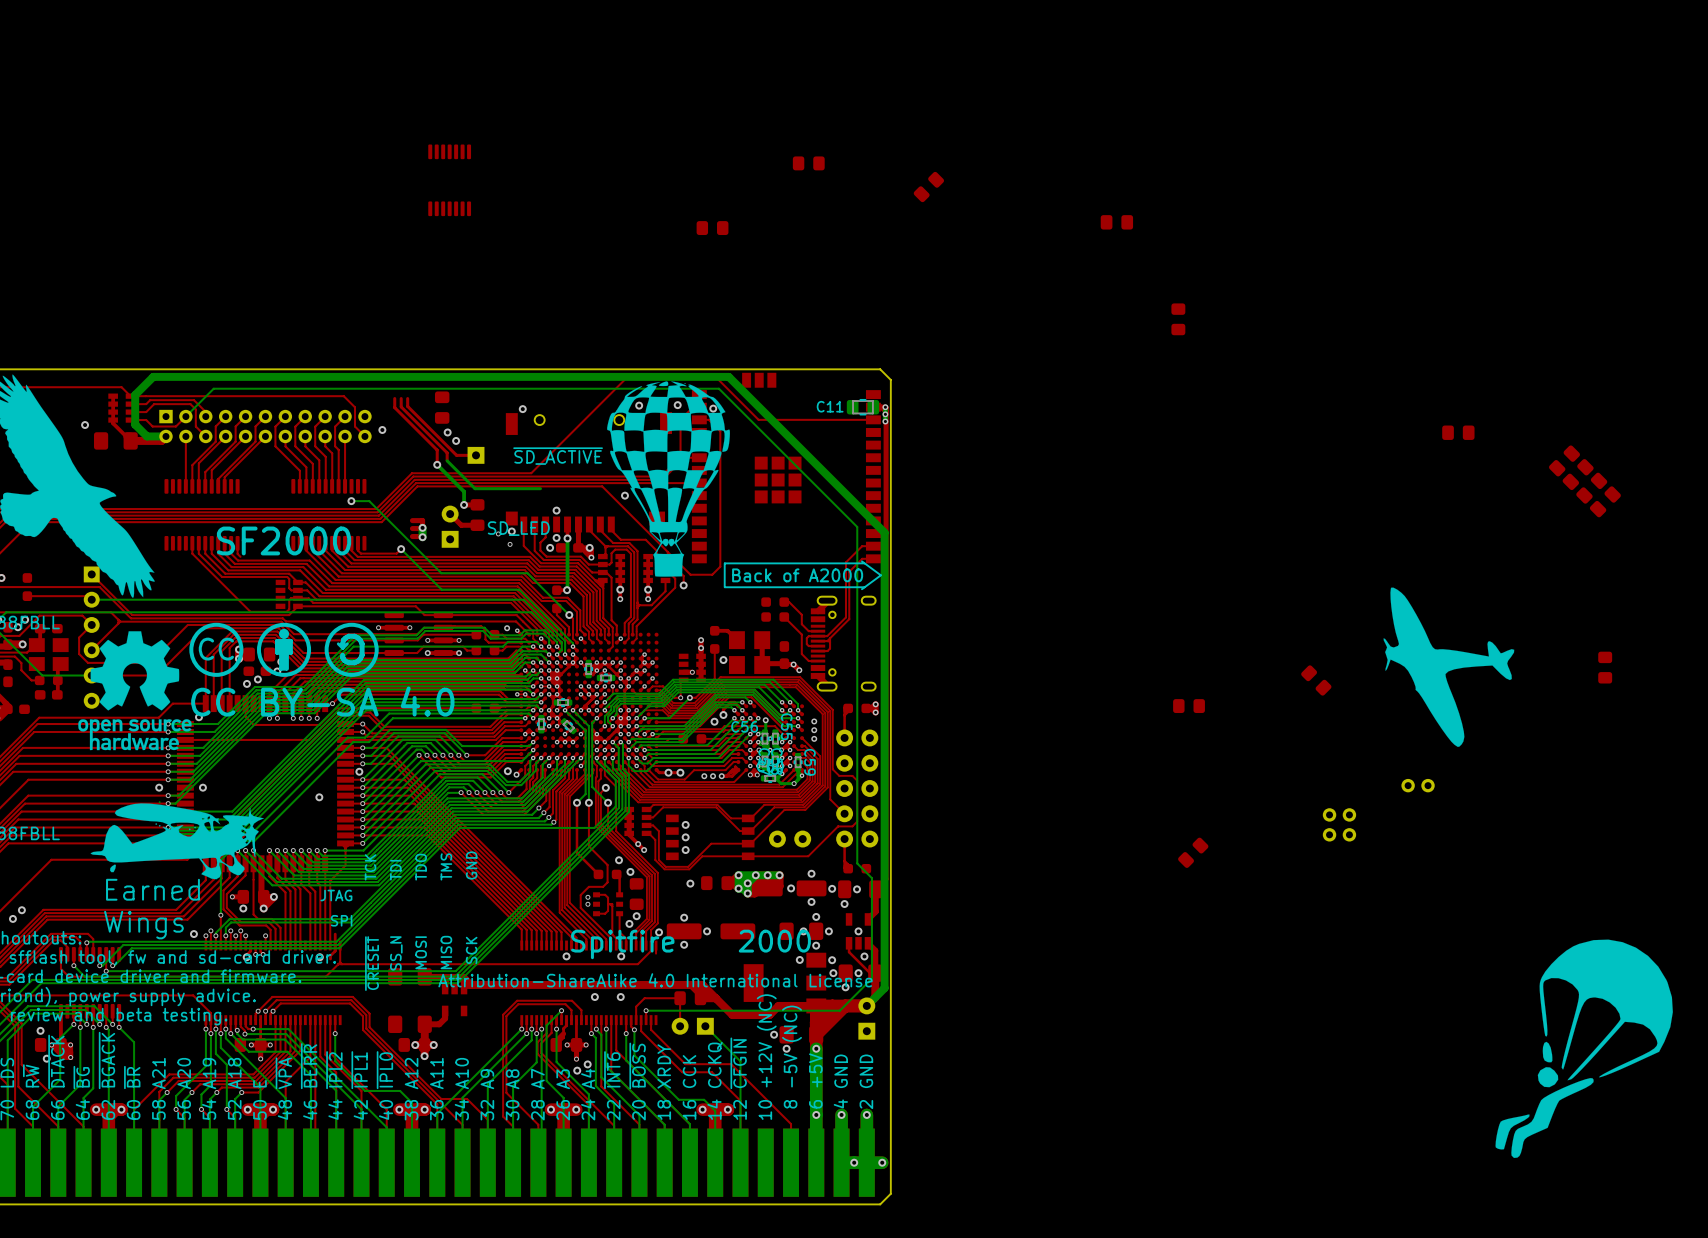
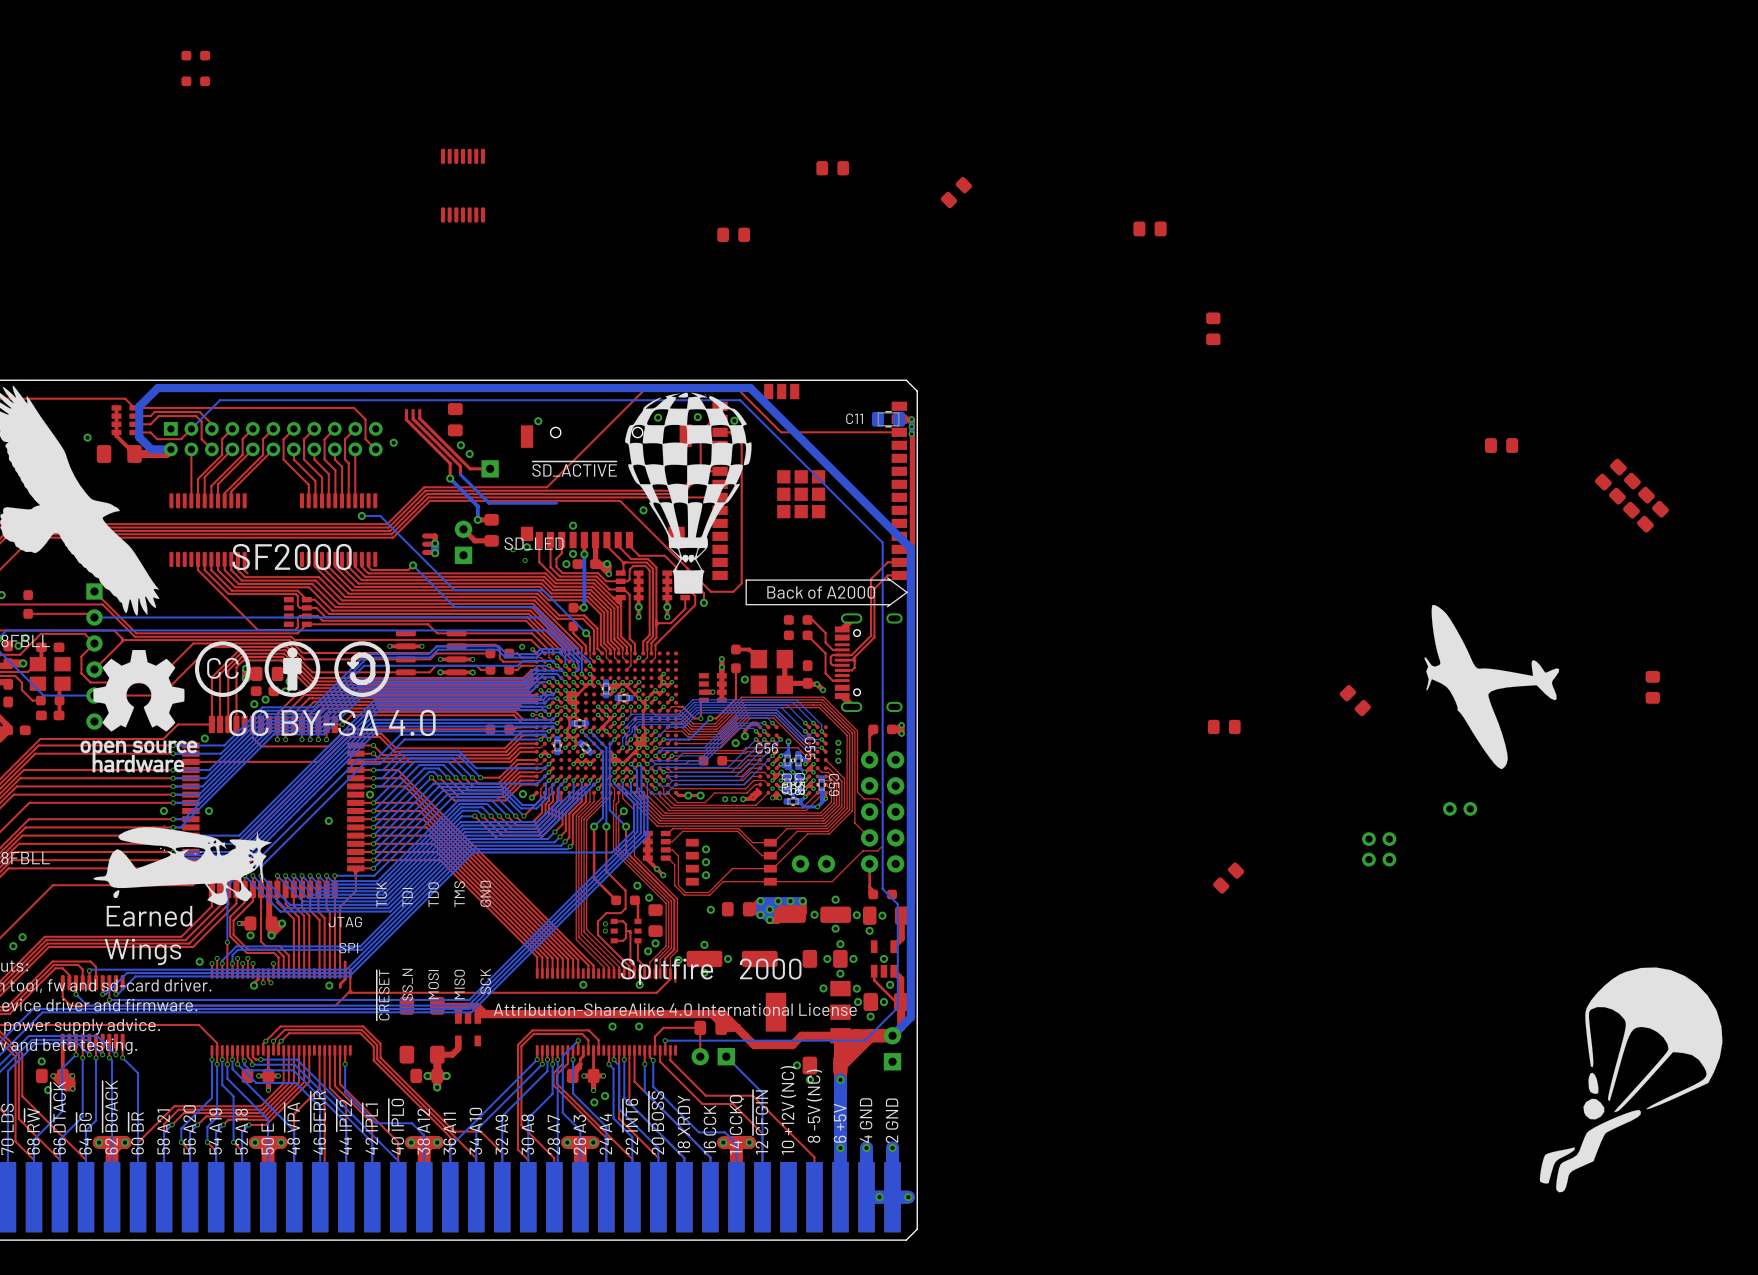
part: none -> (195, 55)
part: none -> (195, 81)

